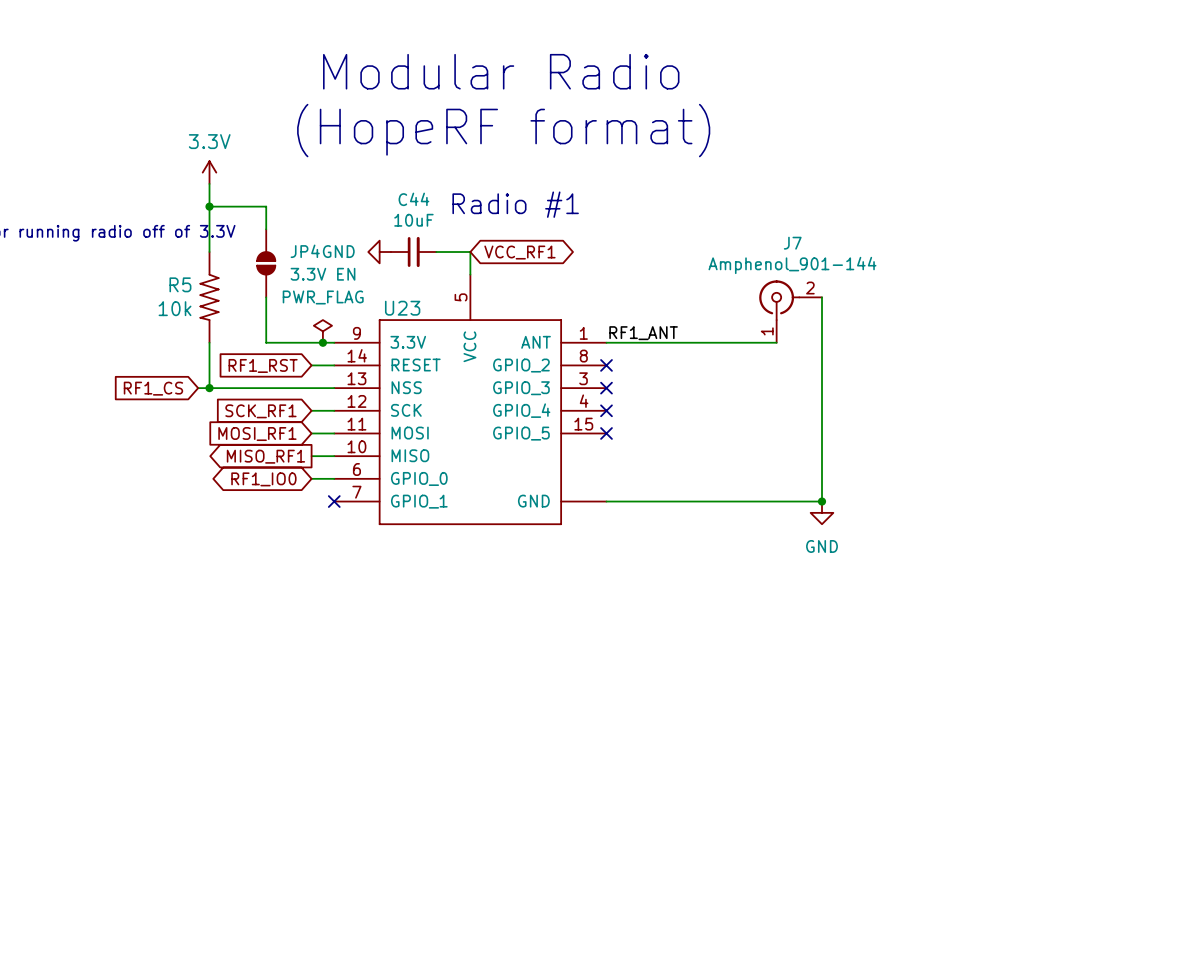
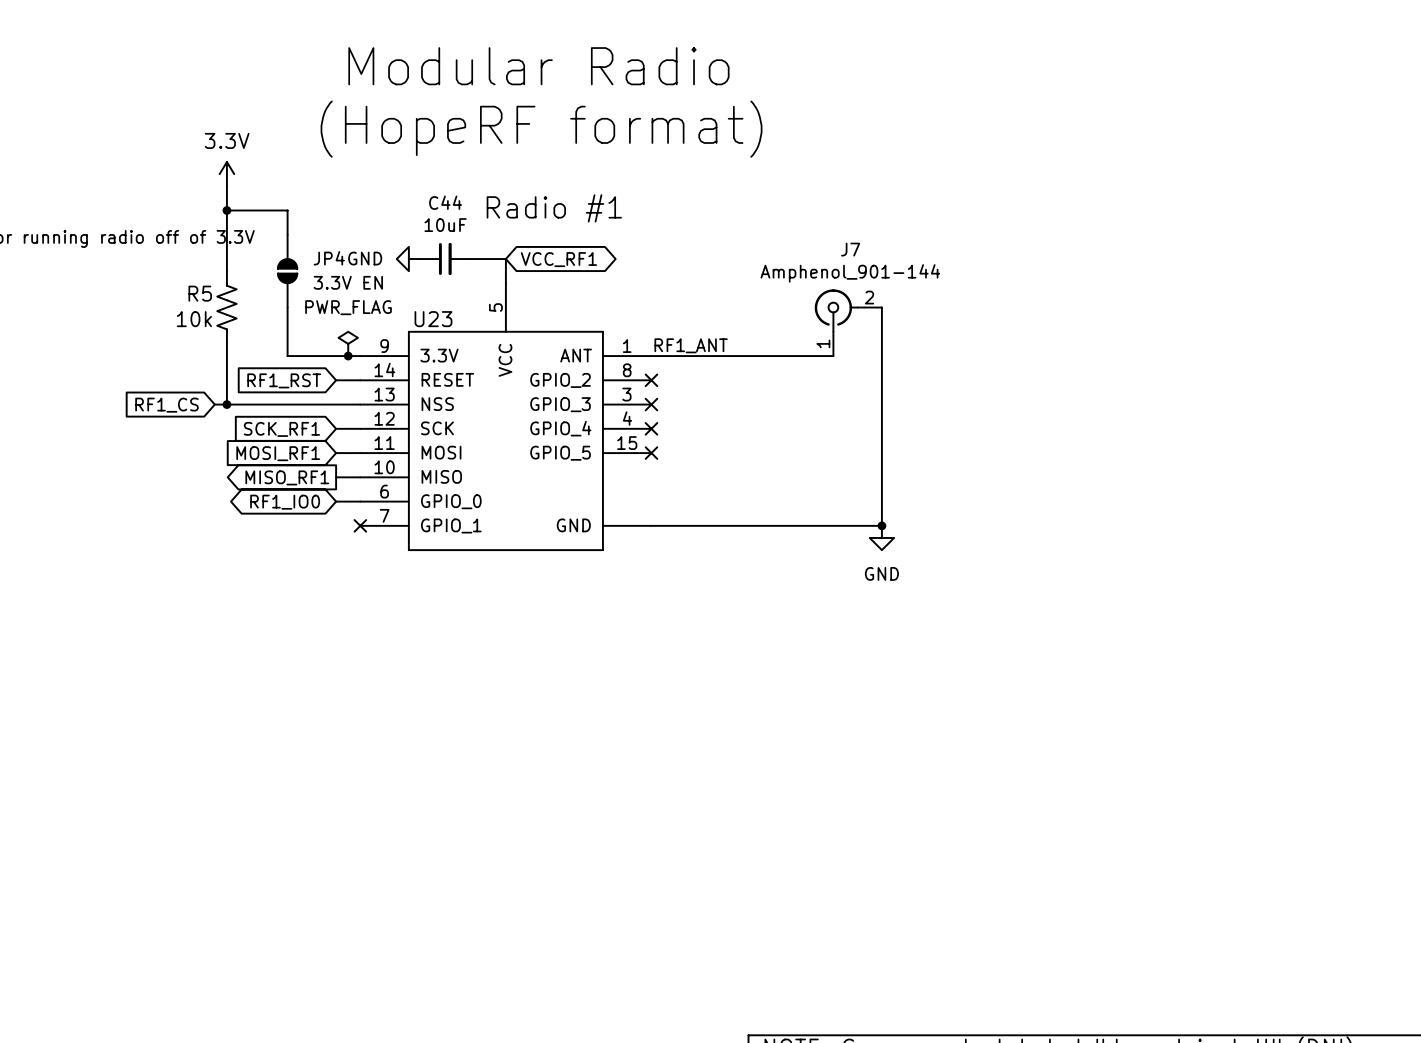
R5 symbol: [200, 252, 219, 343] -> [217, 271, 237, 344]

